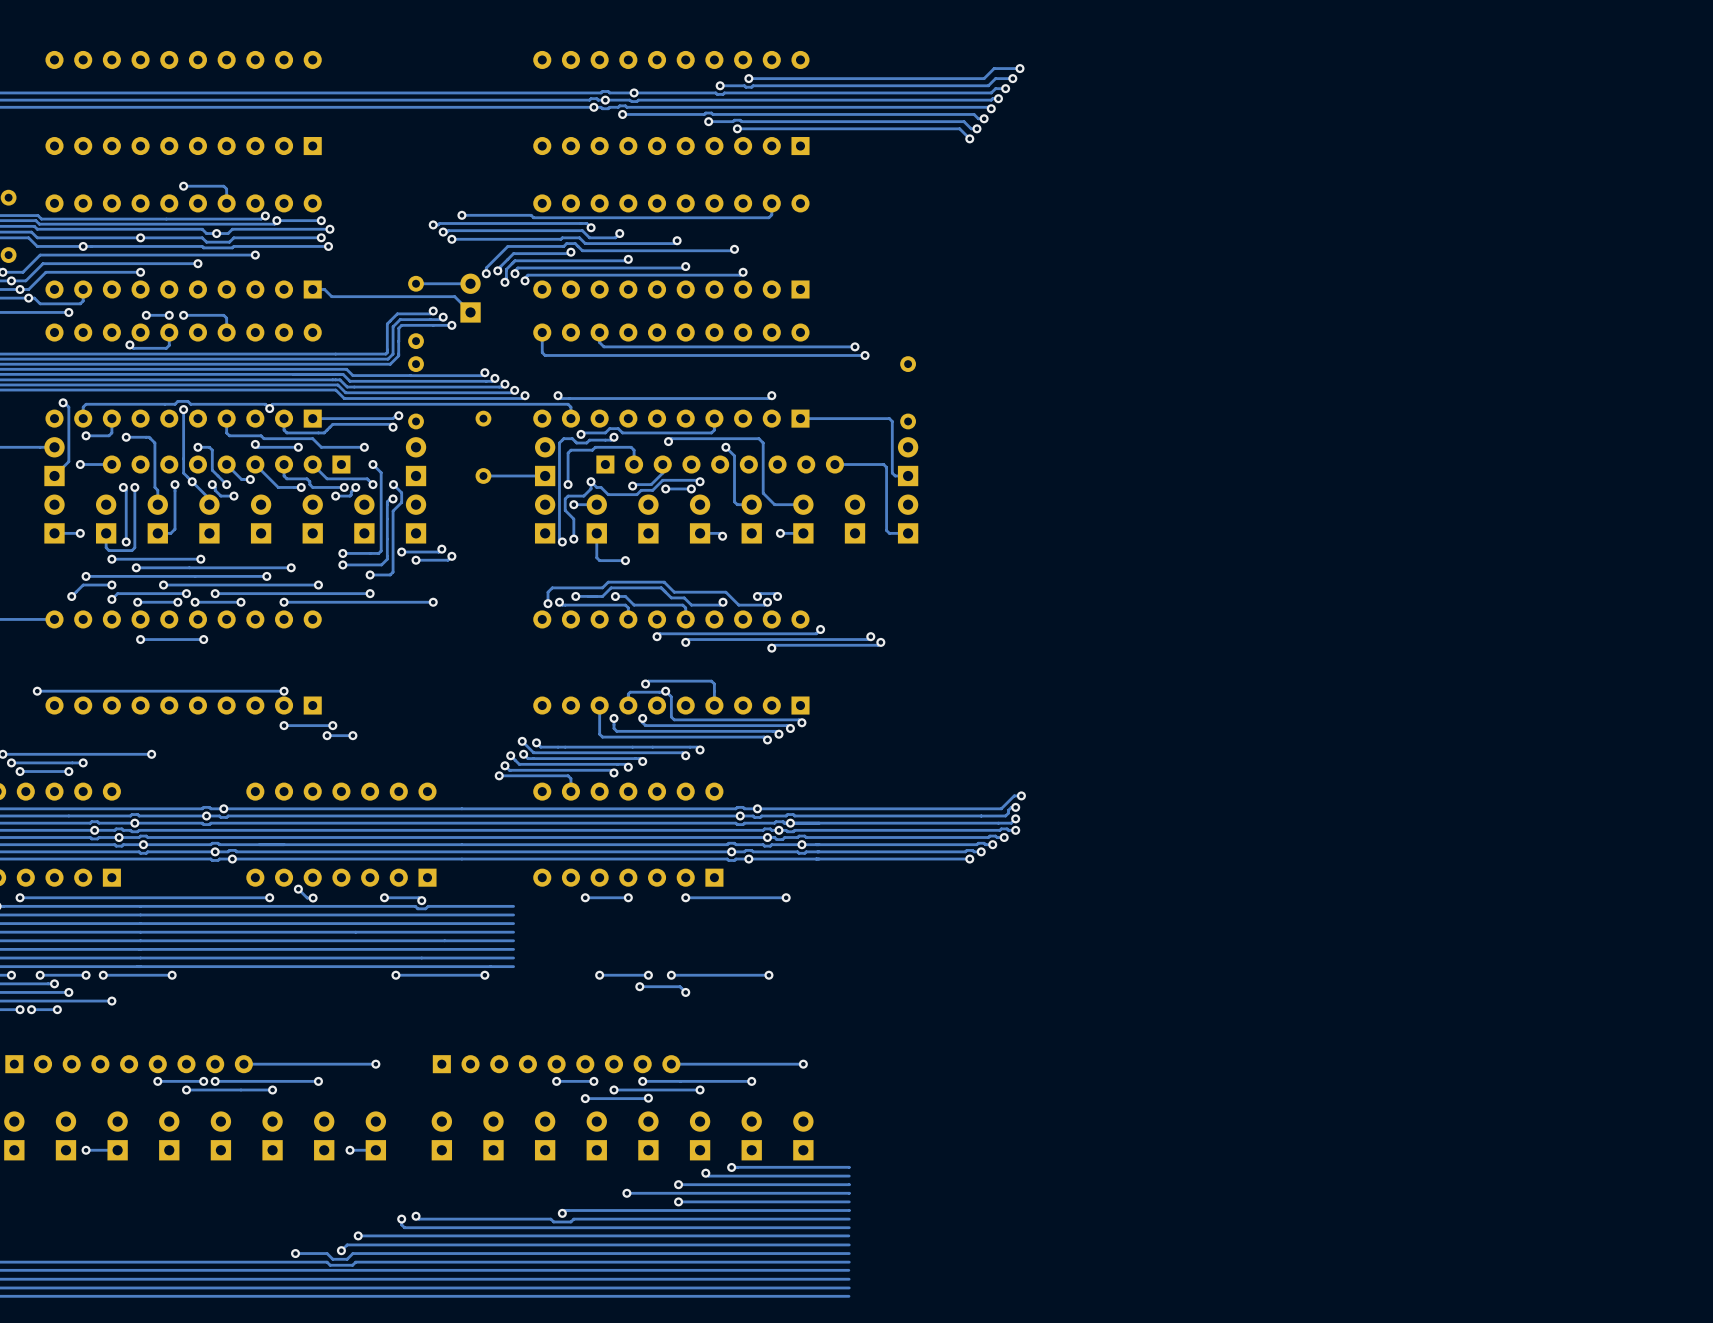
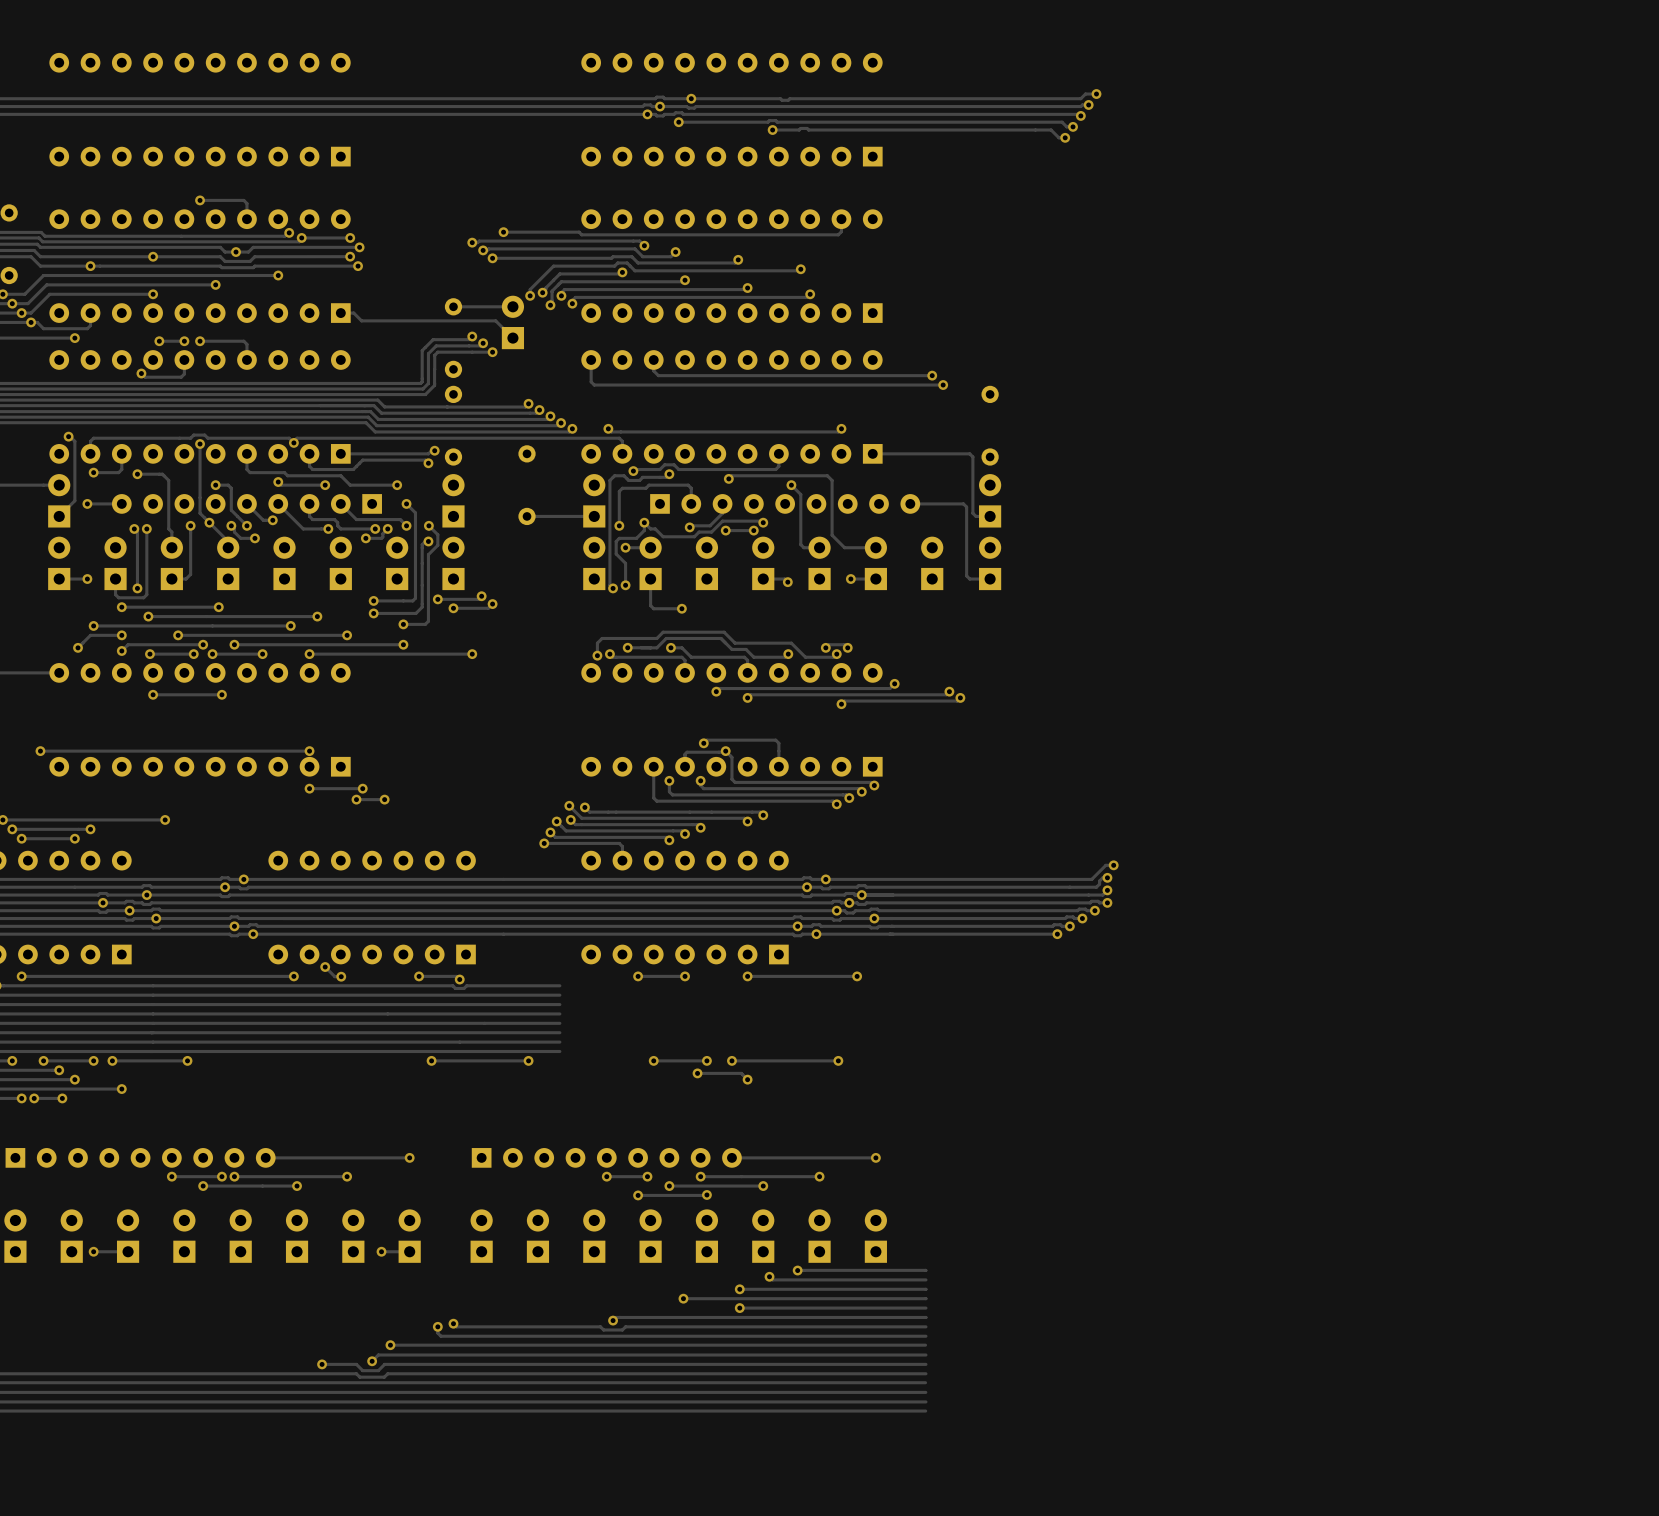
track: (1019, 68) (994, 68) (984, 78) (748, 78) -> none
via: (1019, 68) -> none
via: (748, 78) -> none
track: (1012, 78) (995, 78) (988, 85) (720, 85) -> none
via: (1012, 78) -> none
via: (720, 85) -> none
track: (737, 128) (959, 128) (969, 138) -> none
via: (737, 128) -> none
via: (969, 138) -> none

